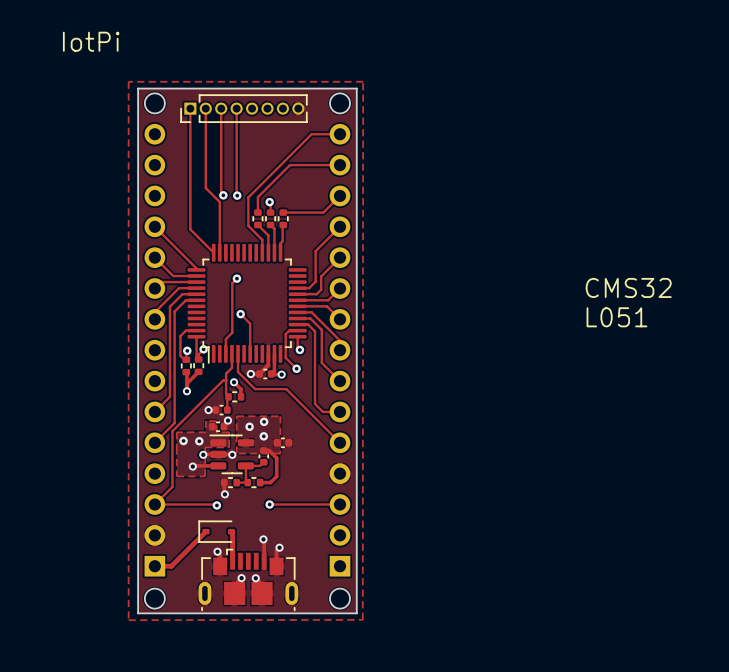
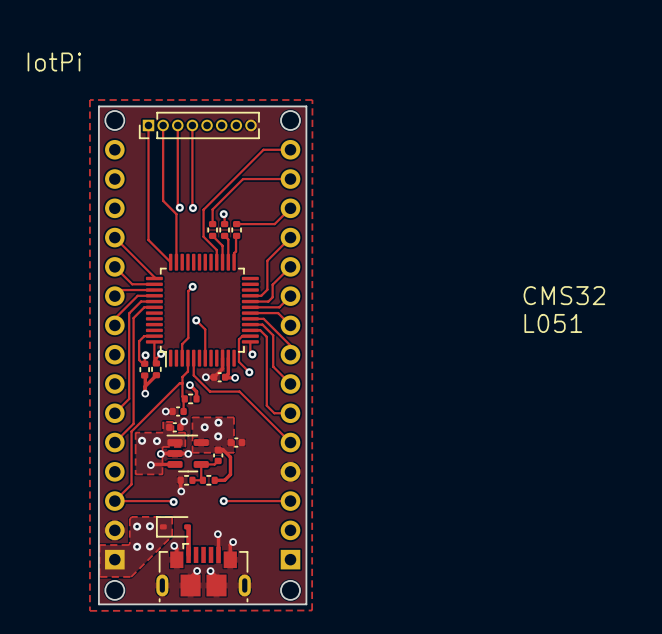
zone outline: none -> (131, 516) (172, 516) (172, 535) (131, 576) (100, 576) (99, 545) (128, 545) (129, 518) (131, 516)
via: none -> (137, 526)
via: none -> (149, 526)
track: (205, 531) (171, 566) (154, 566) -> none
via: none -> (137, 546)
via: none -> (149, 546)

